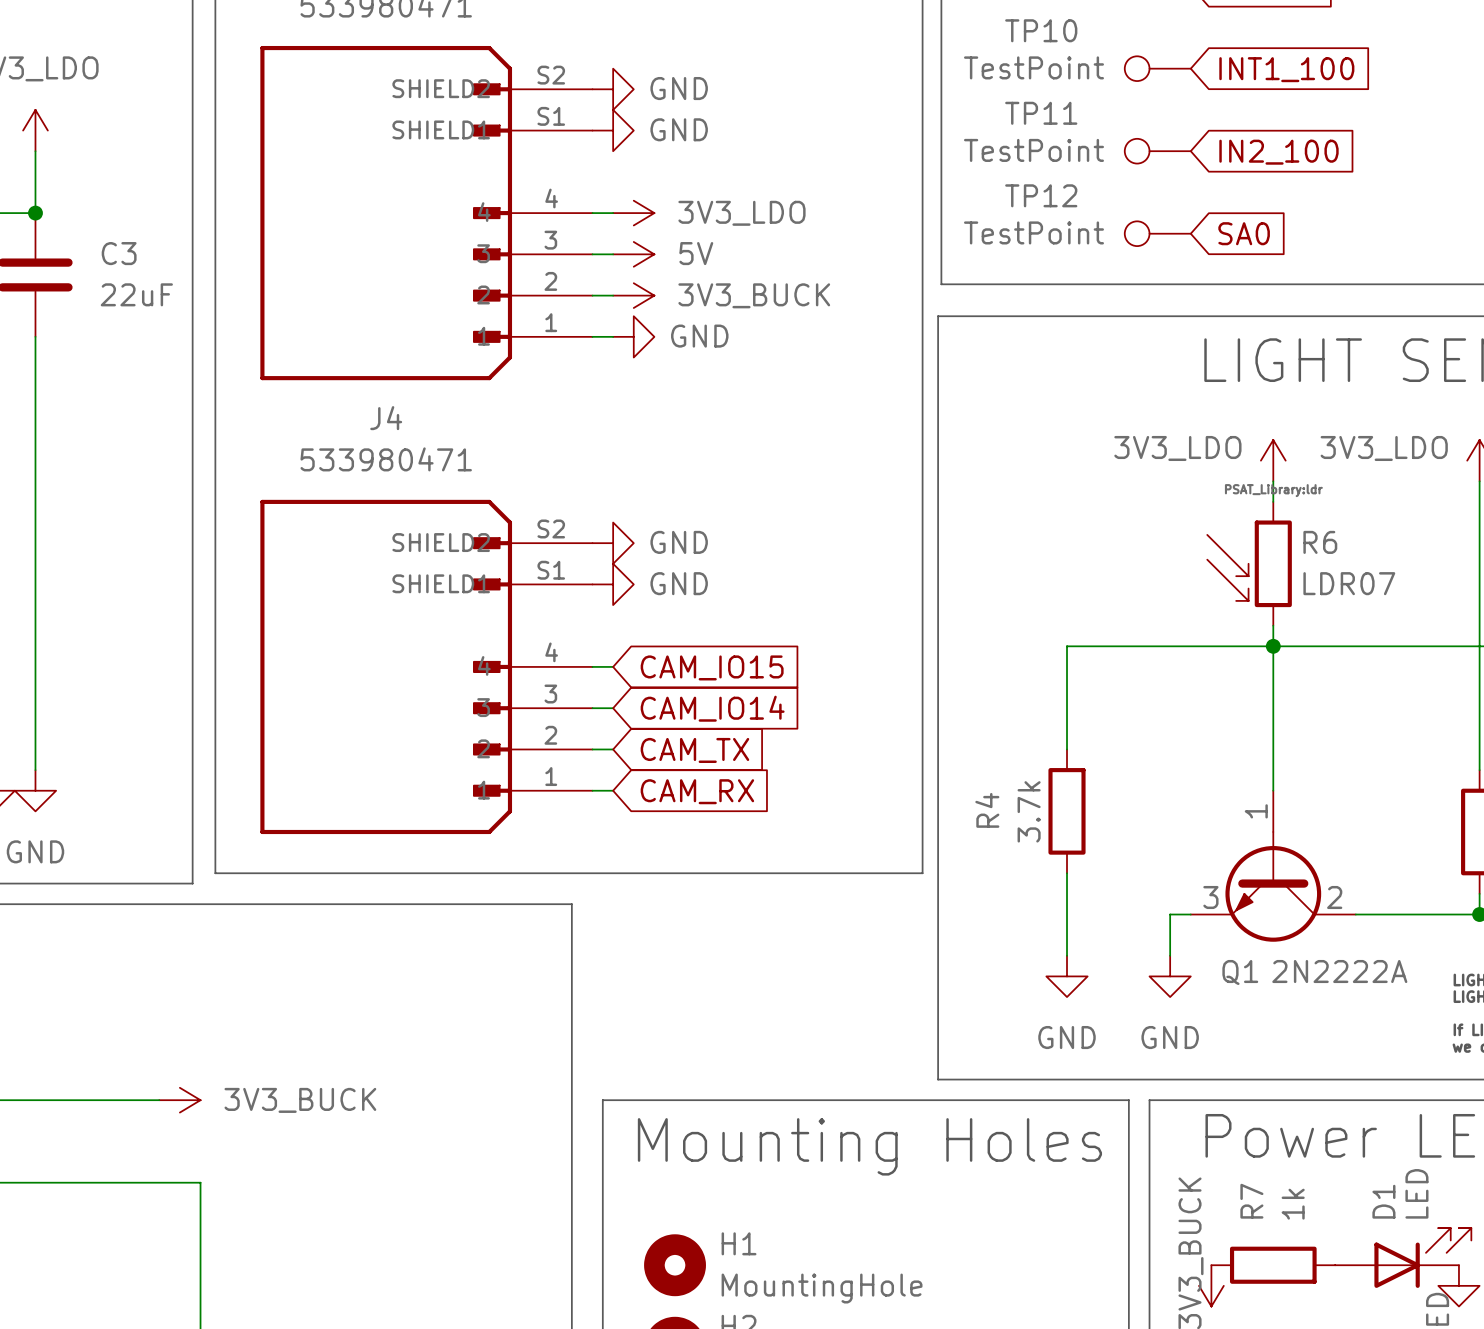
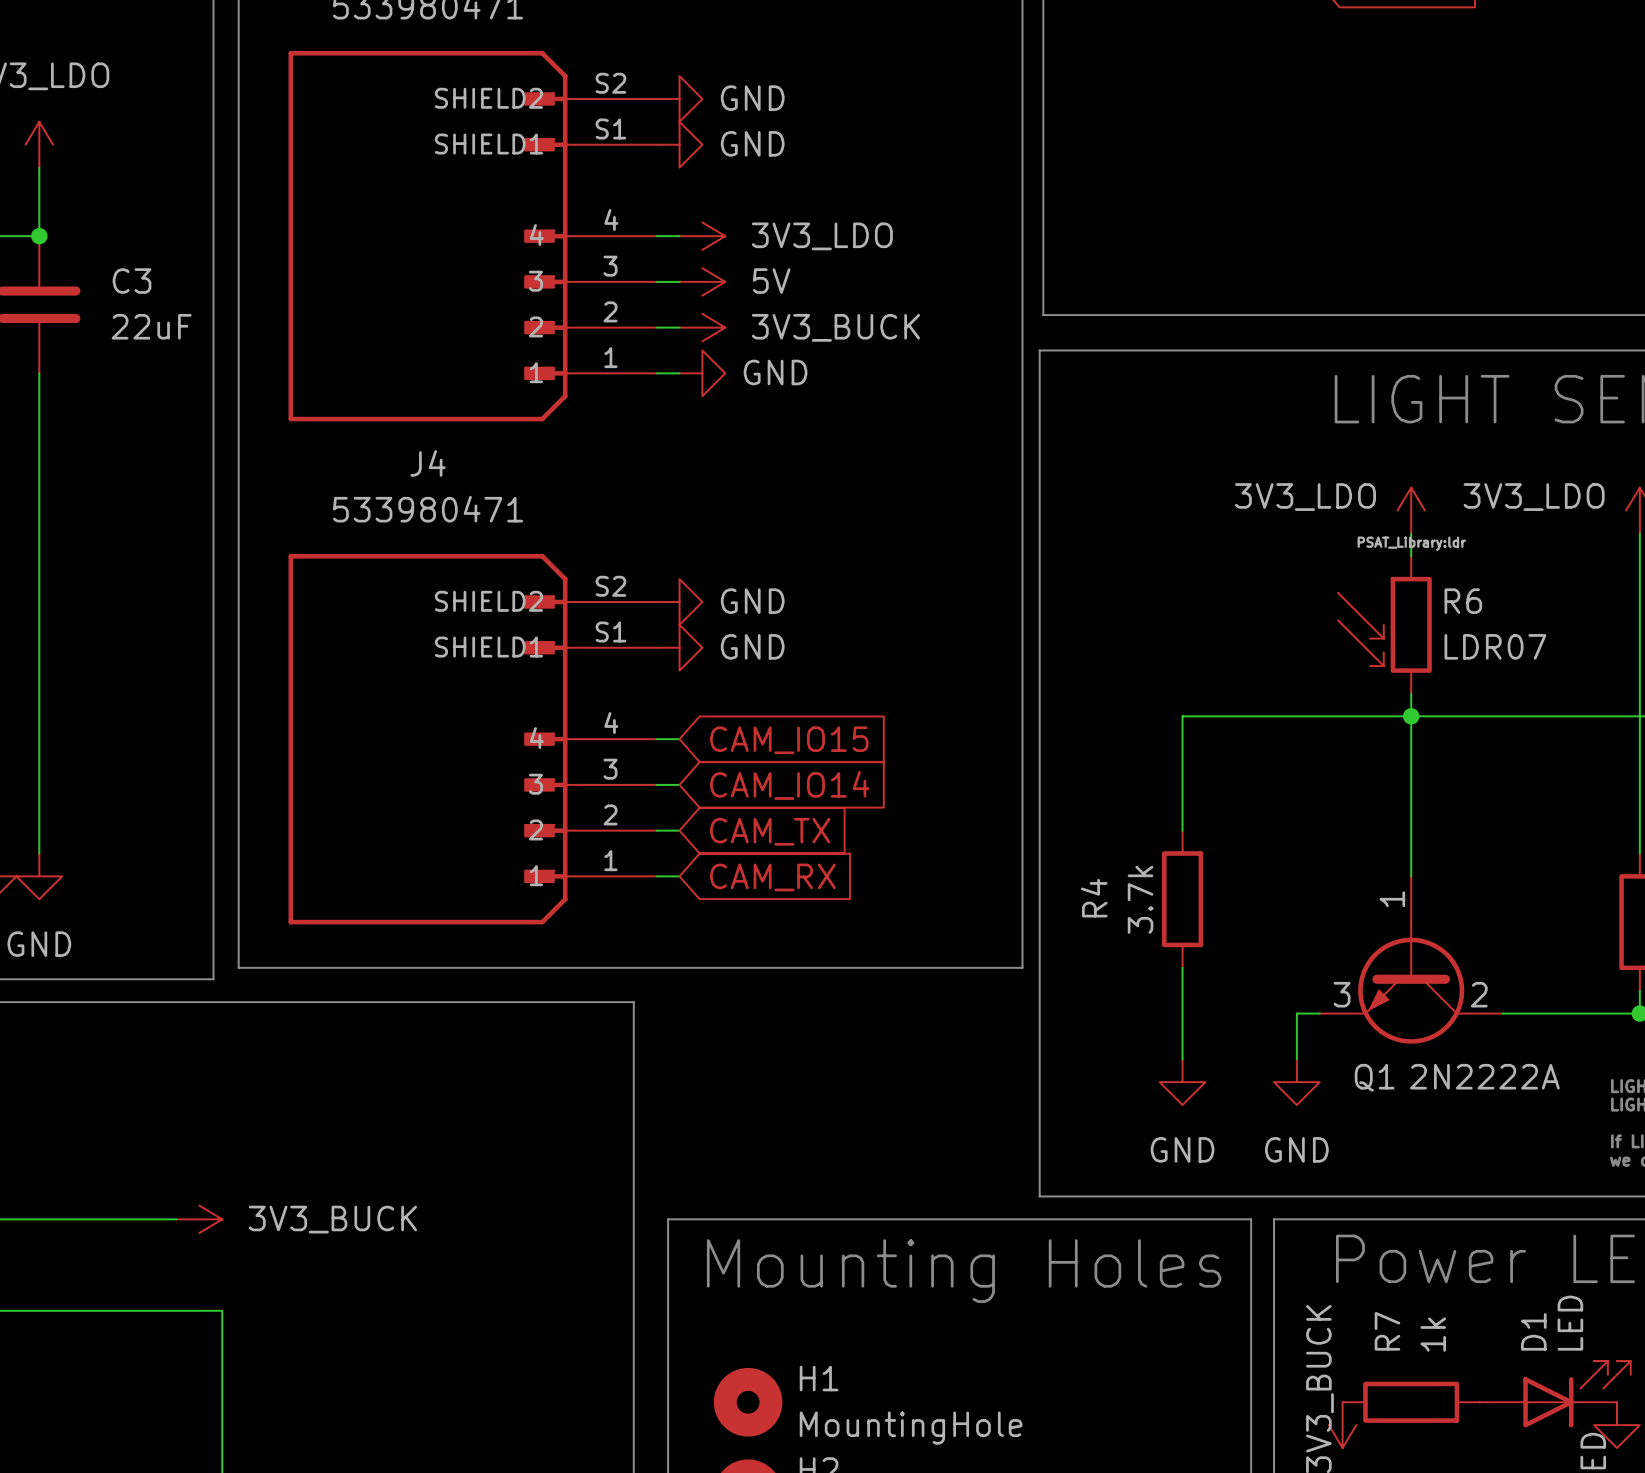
TP10: TestPoint (1157, 68) -> none
global label: INT1_100 (1286, 69) -> none
TP11: TestPoint (1157, 151) -> none
global label: IN2_100 (1278, 152) -> none
TP12: TestPoint (1157, 233) -> none
global label: SA0 (1244, 233) -> none

